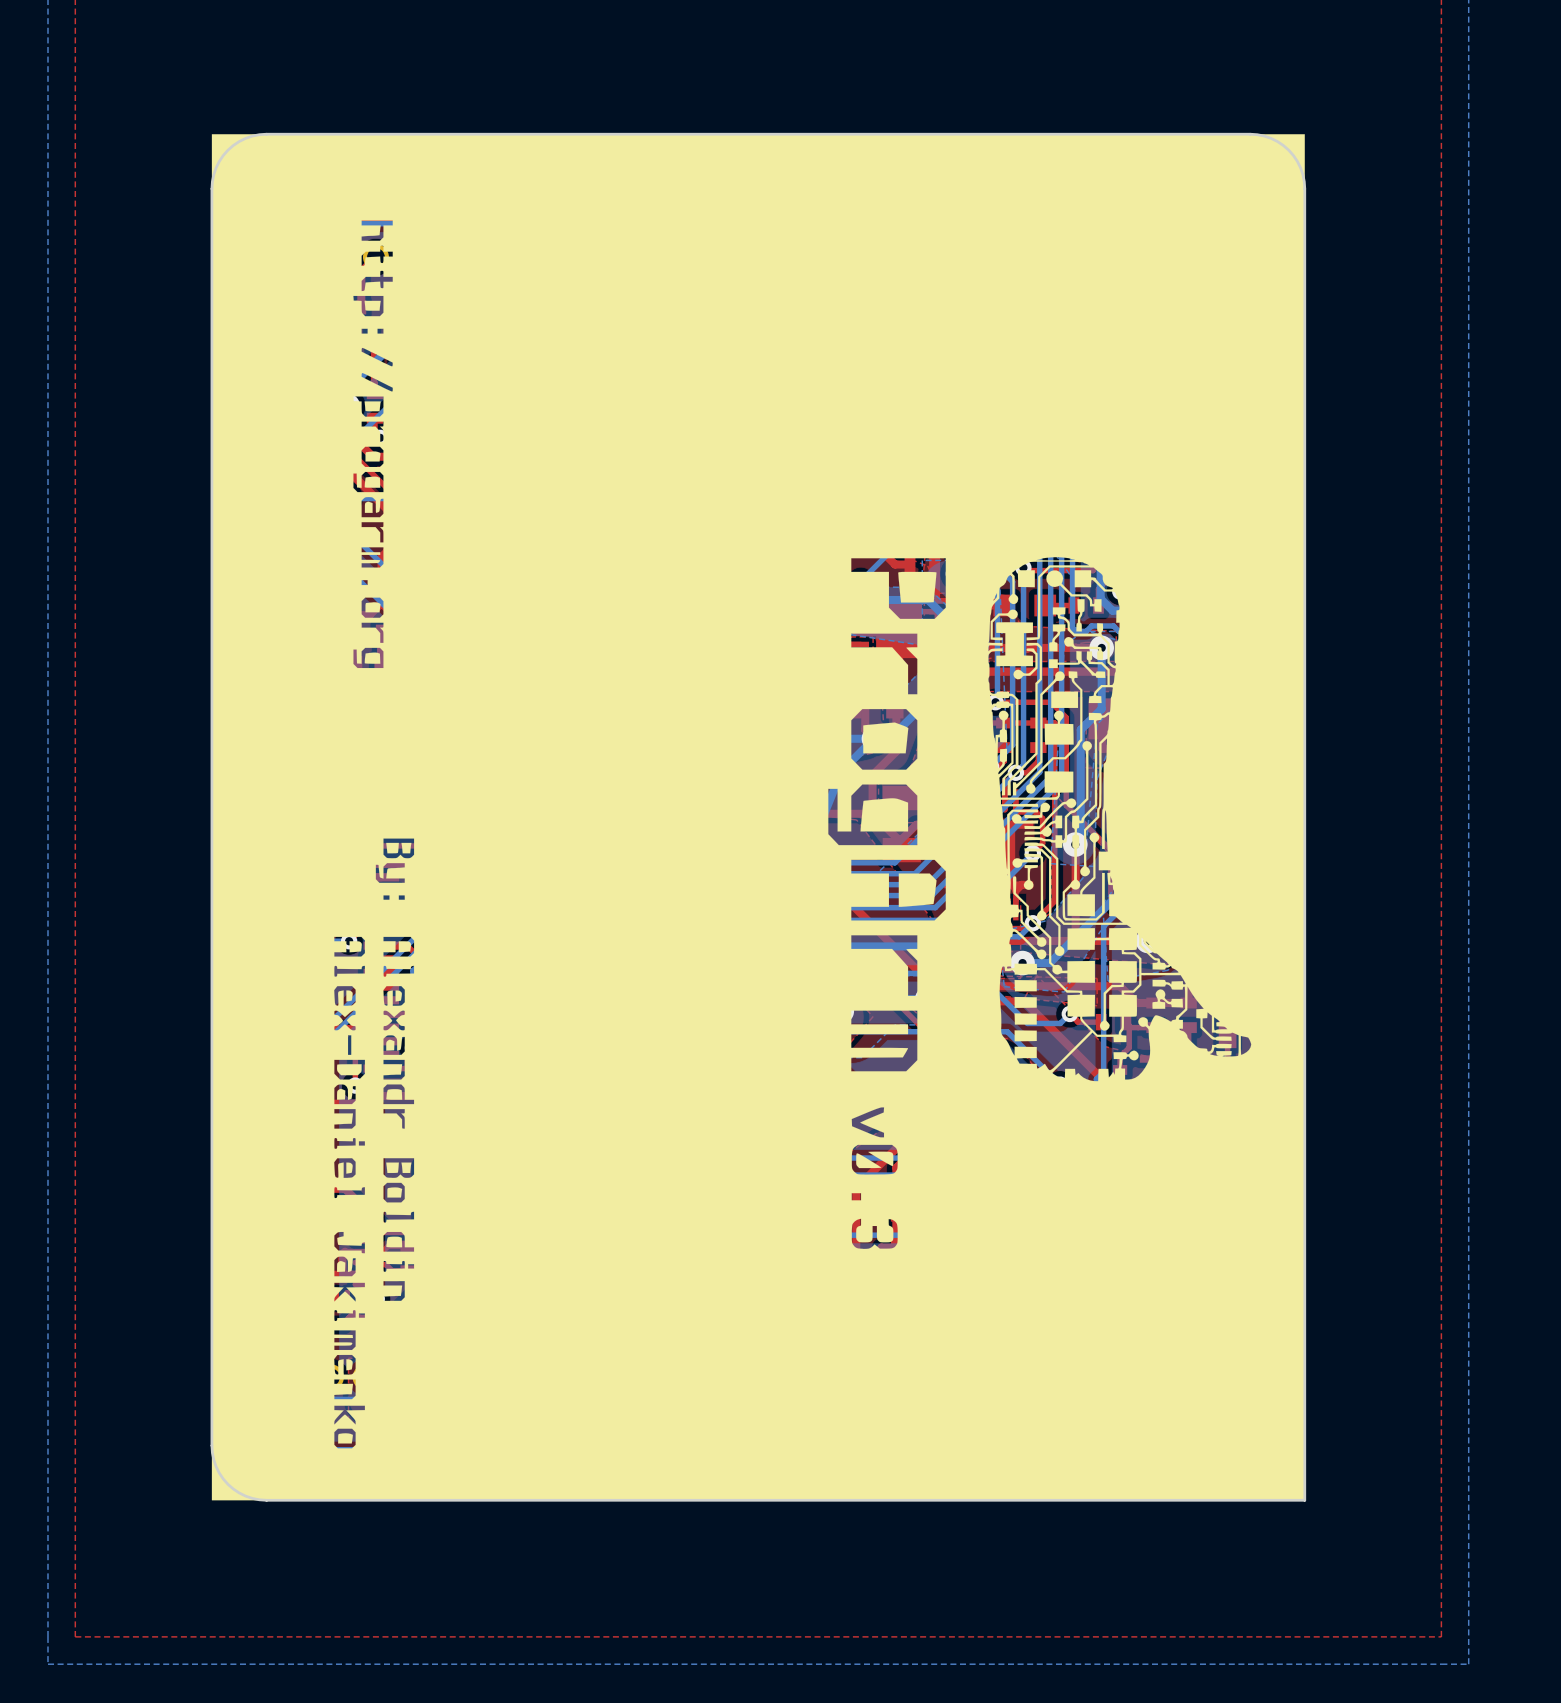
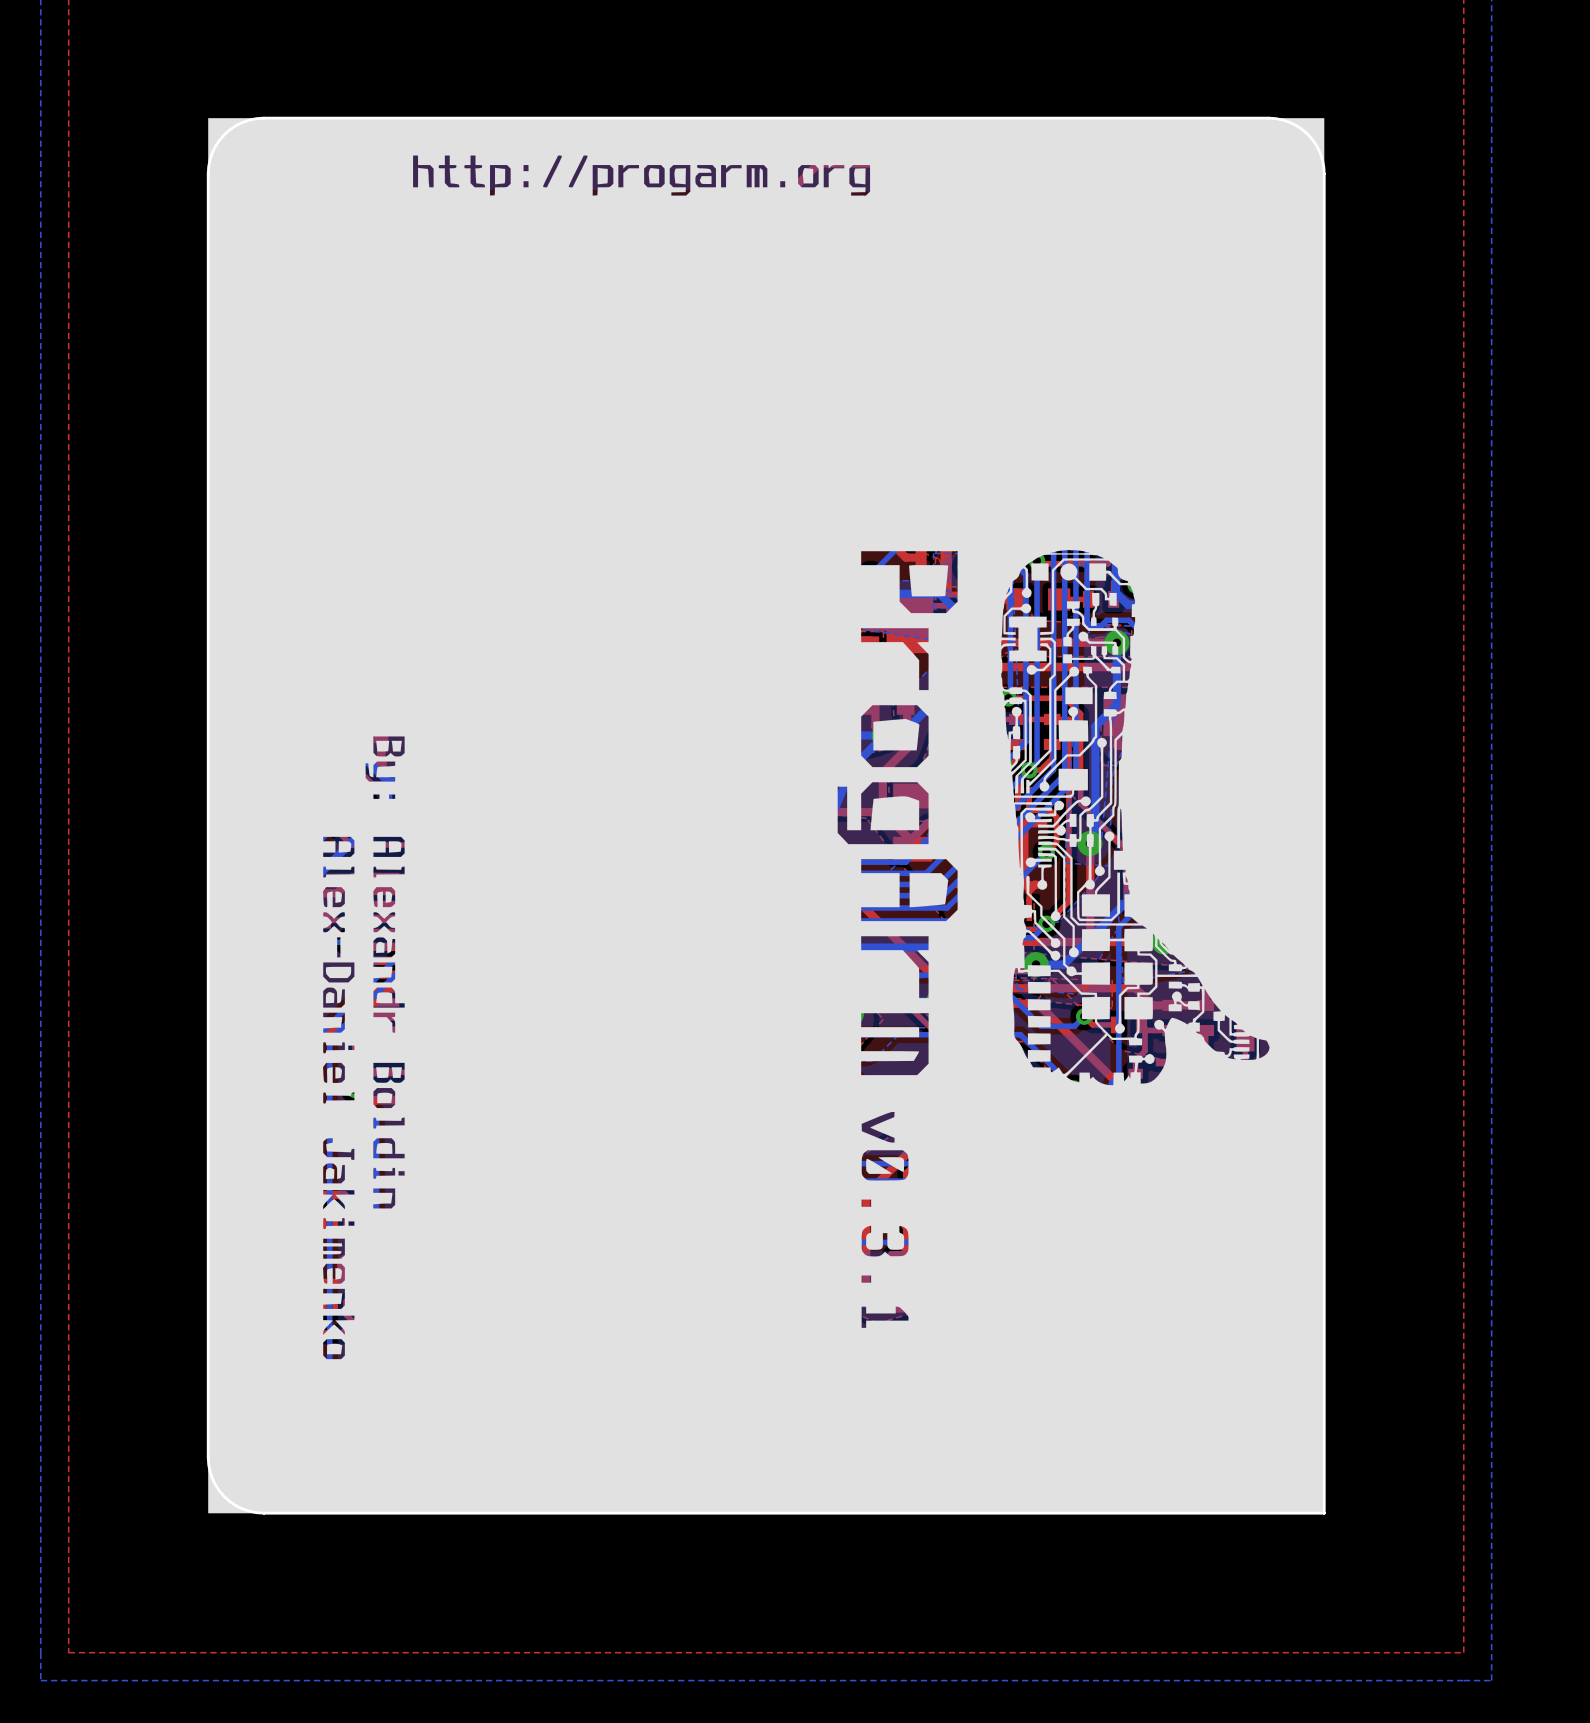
drawing shape: [211, 134, 1305, 1501] -> [208, 118, 1325, 1514]

